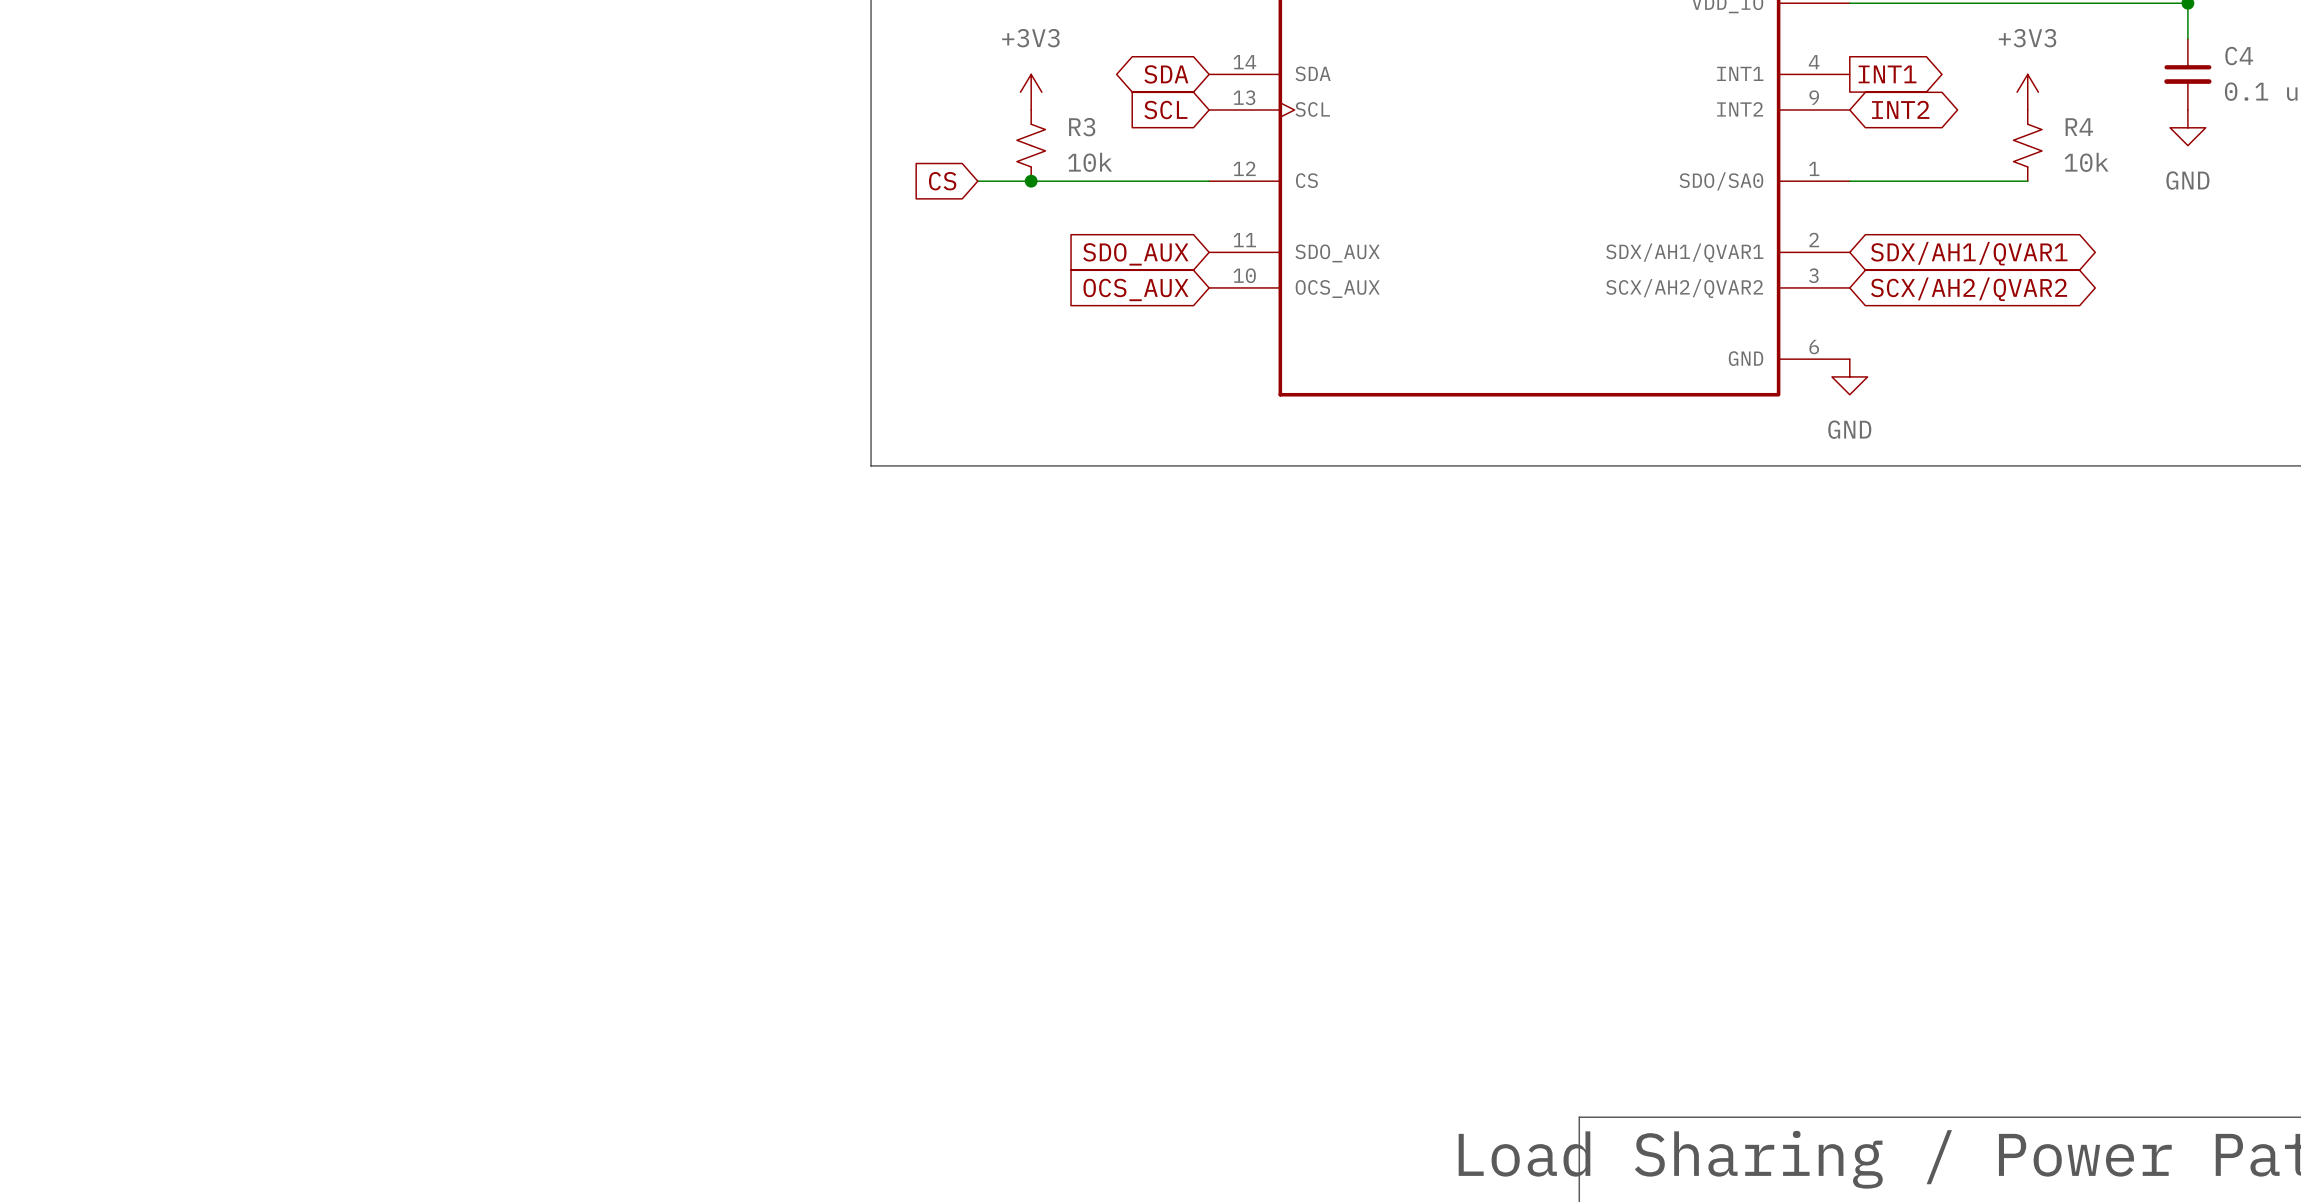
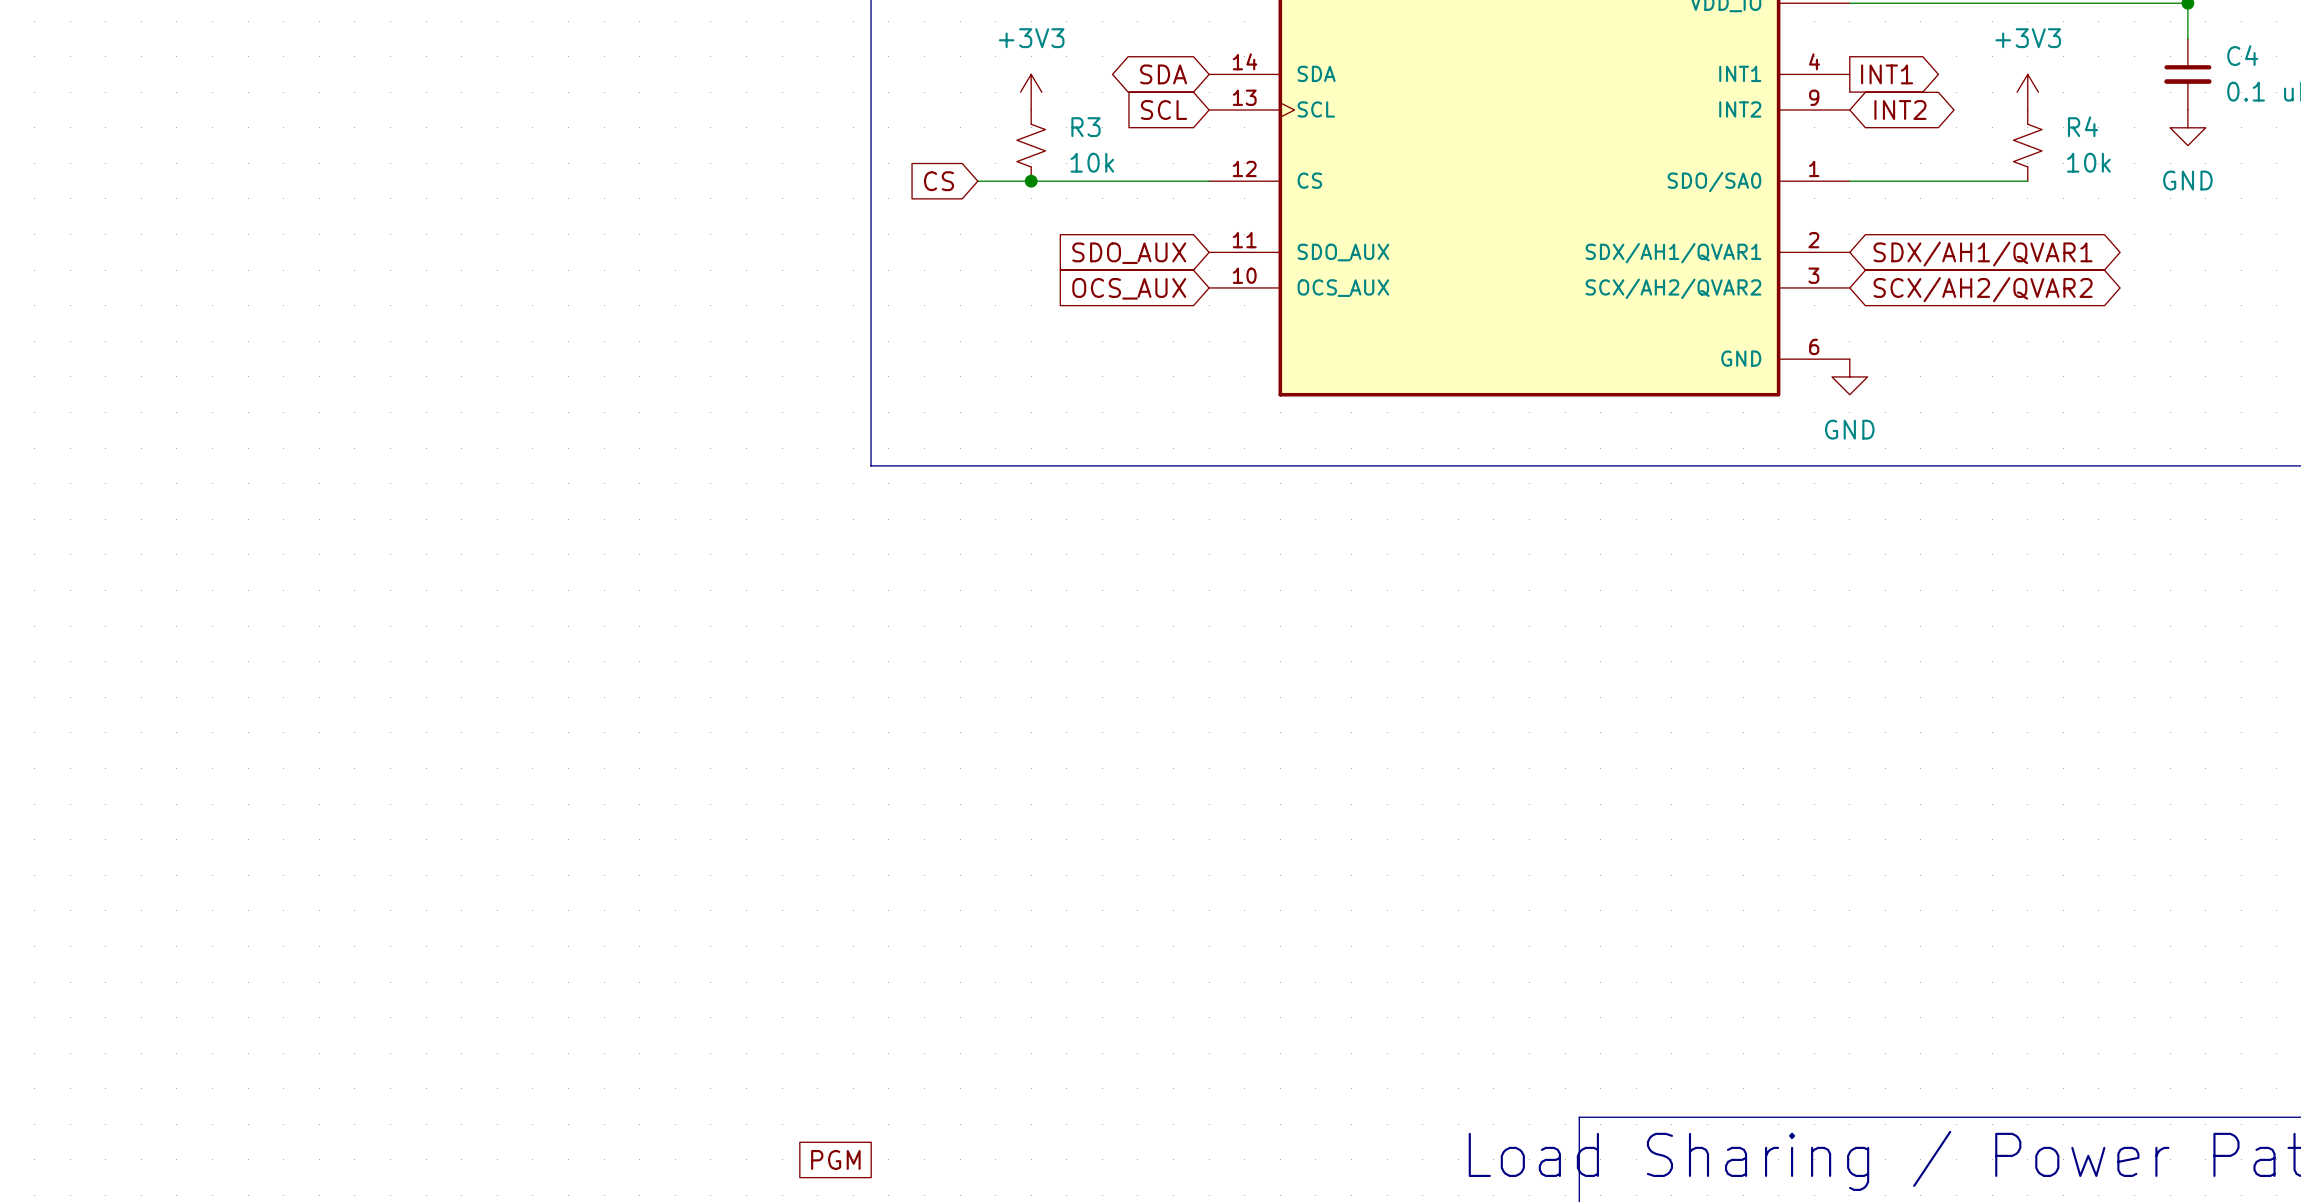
global label: none -> PGM (835, 1159)

